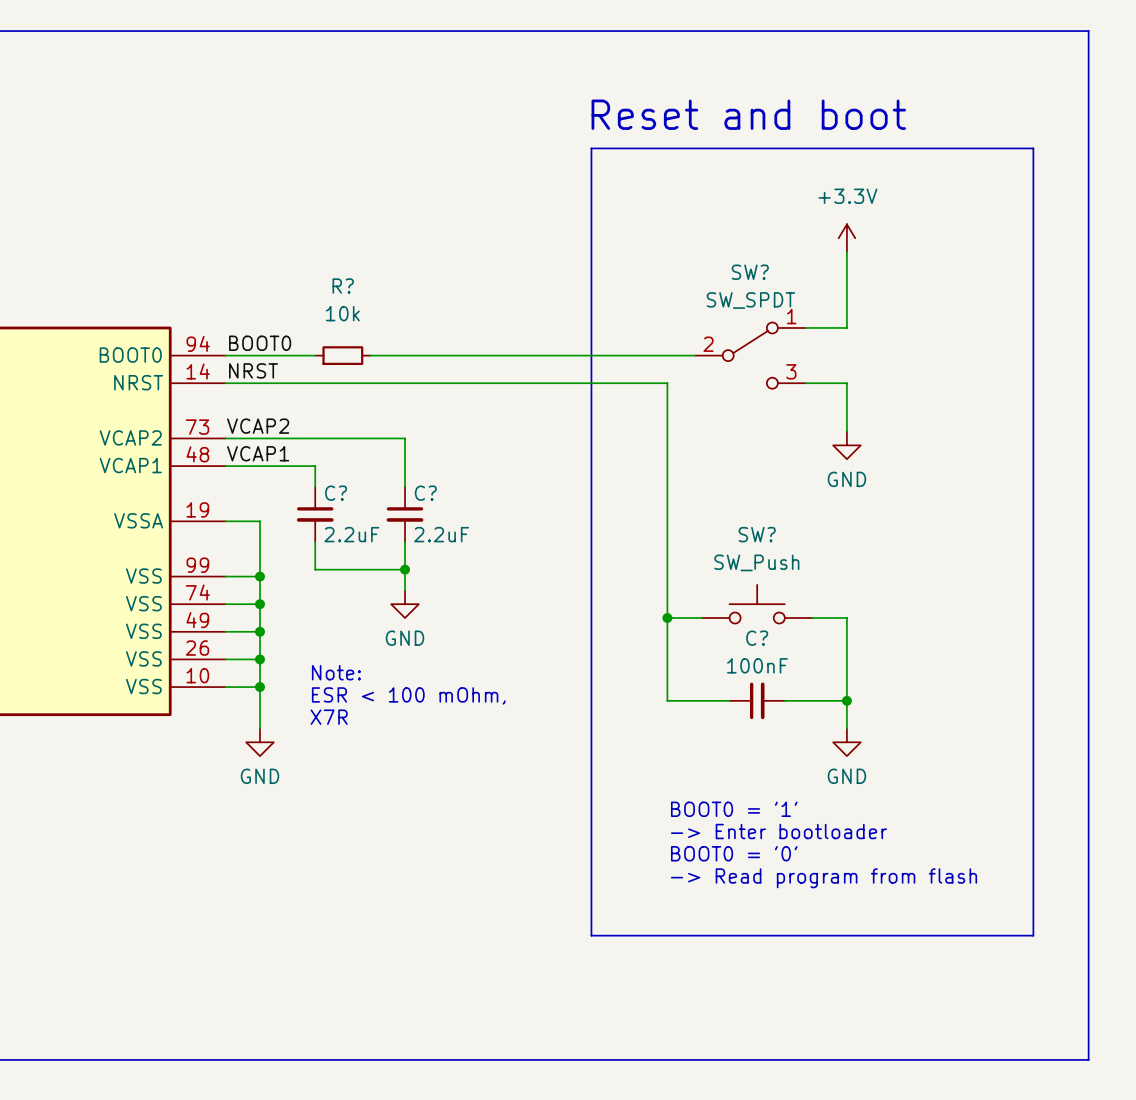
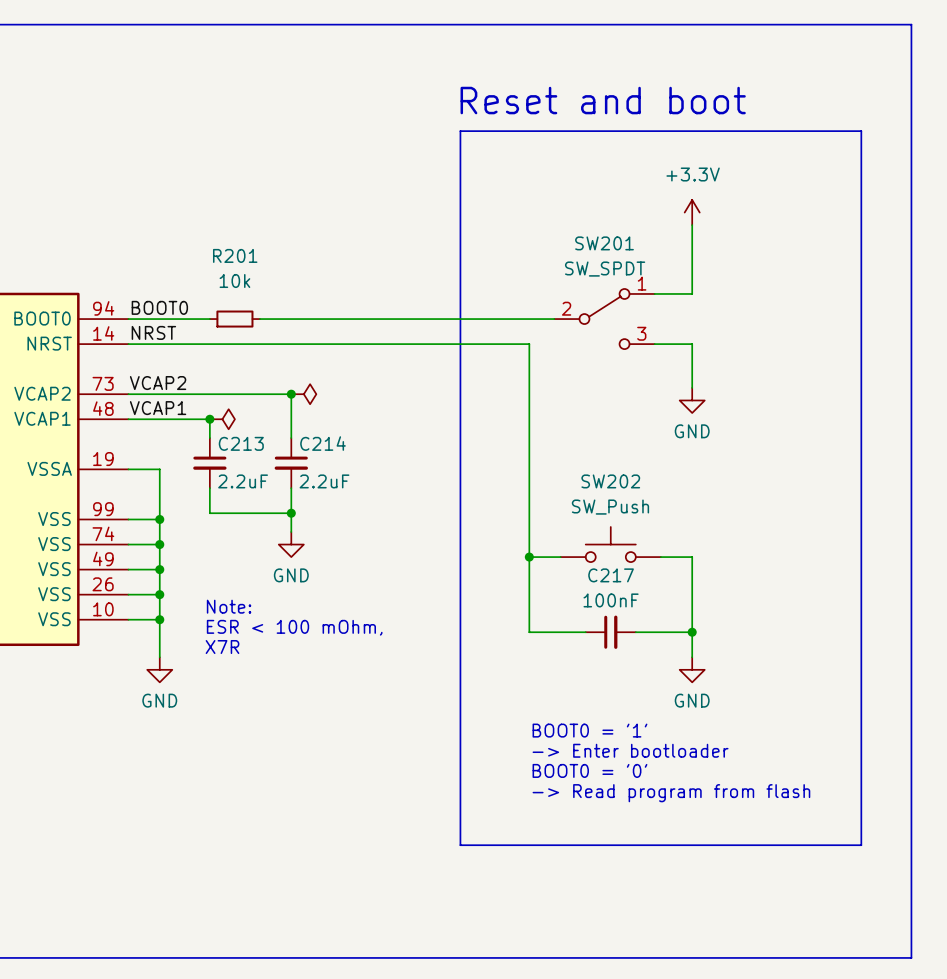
SW? name: SW? (750, 272) -> SW201 (604, 243)
R? name: R? (343, 286) -> R201 (235, 255)
junction: none -> (291, 394)
power symbol: none -> (303, 394)
junction: none -> (209, 419)
power symbol: none -> (222, 419)
C? name: C? (336, 493) -> C213 (241, 443)
C? name: C? (425, 493) -> C214 (323, 443)
SW? name: SW? (757, 534) -> SW202 (610, 481)
C? name: C? (757, 638) -> C217 (611, 575)

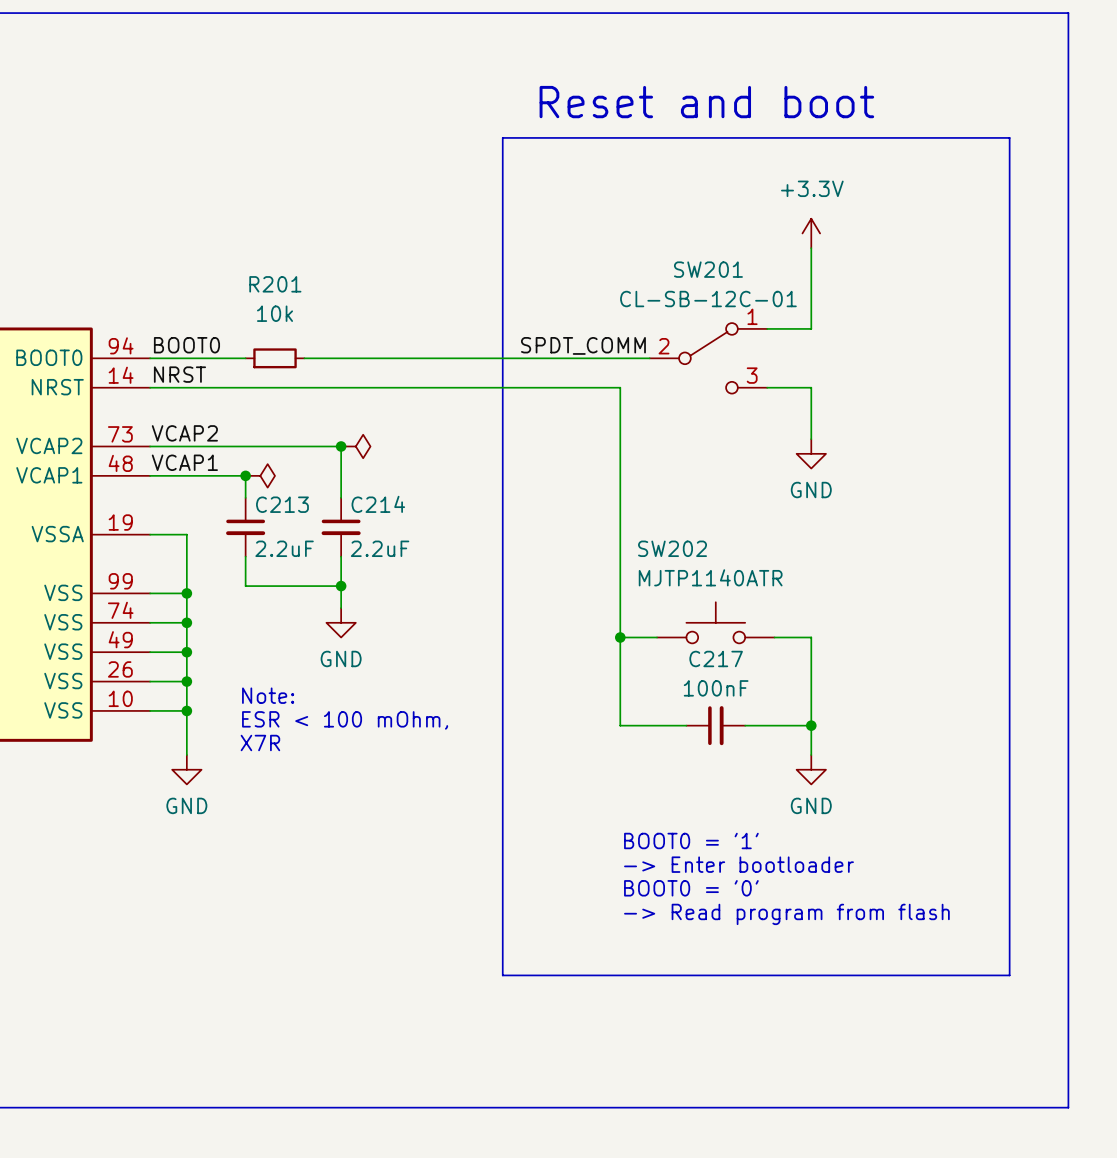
line: (460, 131) (460, 845) -> (539, 137) (502, 137) (502, 975) (539, 975)
SW201 value: SW_SPDT (605, 269) -> CL-SB-12C-01 (708, 299)
label: none -> SPDT_COMM (583, 345)
SW202 name position: SW202 (610, 481) -> SW202 (672, 548)
SW202 value: SW_Push (610, 507) -> MJTP1140ATR (710, 577)

